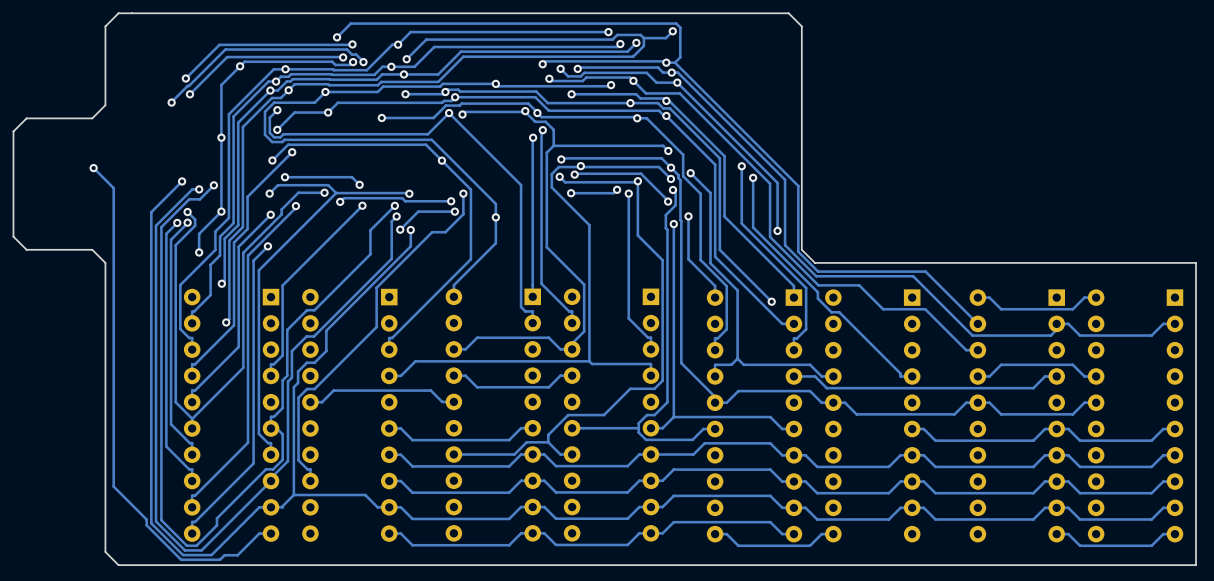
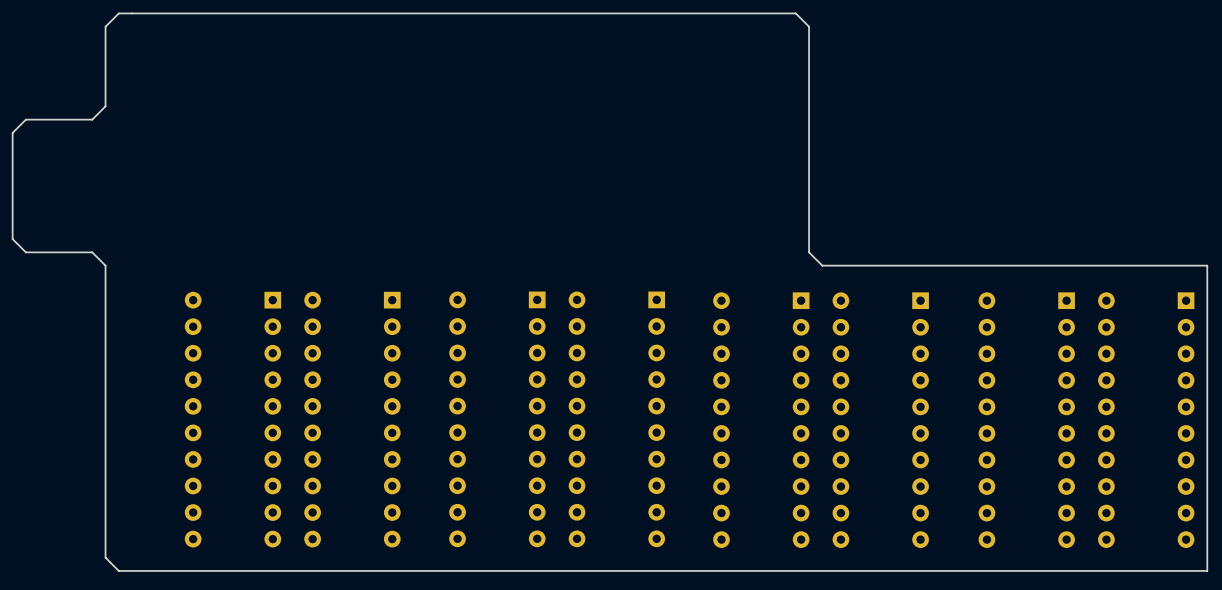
track: (672, 31) (665, 38) (643, 38) -> none
via: (672, 31) -> none
track: (608, 32) (410, 32) (398, 44) (392, 44) (366, 70) (273, 69) (228, 114) (228, 218) (215, 231) (215, 249) (180, 285) (180, 329) (189, 338) (192, 338) (192, 349) -> none
via: (608, 32) -> none
track: (337, 37) (350, 23) (676, 23) (680, 27) (680, 57) (675, 62) -> none
via: (337, 37) -> none
track: (643, 38) (640, 34) (617, 34) (612, 39) (426, 39) (406, 59) -> none
track: (643, 38) (643, 45) (633, 56) (463, 56) (438, 81) (381, 81) (377, 85) (294, 84) (280, 98) (271, 98) (242, 127) (242, 227) (229, 240) (229, 319) (226, 322) -> none
track: (636, 42) (627, 51) (461, 51) (438, 74) (382, 74) (376, 79) (292, 79) (286, 81) (277, 90) (270, 90) (238, 122) (238, 225) (224, 238) (224, 280) (221, 283) -> none
via: (636, 42) -> none
track: (352, 44) (219, 44) (185, 78) -> none
via: (352, 44) -> none
via: (398, 44) -> none
track: (620, 44) (617, 47) (434, 47) (414, 66) (382, 66) (374, 74) (291, 74) (288, 76) (280, 76) (276, 81) (268, 81) (233, 116) (233, 223) (220, 236) (220, 255) (210, 264) (210, 295) (192, 311) (192, 323) -> none
via: (620, 44) -> none
track: (343, 57) (227, 57) (189, 94) -> none
via: (343, 57) -> none
via: (406, 59) -> none
track: (353, 62) (350, 64) (335, 64) (332, 61) (244, 61) (221, 85) (221, 211) (199, 233) (199, 252) -> none
via: (353, 62) -> none
track: (363, 62) (356, 54) (352, 54) (346, 49) (225, 49) (171, 102) -> none
via: (363, 62) -> none
via: (666, 62) -> none
track: (675, 62) (545, 61) (542, 64) -> none
track: (675, 62) (798, 186) (798, 251) (818, 271) (925, 271) (977, 323) -> none
via: (542, 64) -> none
via: (240, 66) -> none
via: (391, 66) -> none
track: (560, 68) (568, 76) (580, 76) (584, 72) (646, 72) (656, 82) (677, 82) (777, 182) (777, 230) -> none
via: (560, 68) -> none
track: (577, 68) (658, 67) (663, 72) (677, 72) (785, 179) (785, 245) (816, 276) (913, 276) (972, 335) (1050, 335) (1062, 323) -> none
via: (577, 68) -> none
via: (285, 69) -> none
via: (671, 72) -> none
via: (403, 74) -> none
via: (185, 78) -> none
track: (549, 78) (551, 81) (582, 81) (586, 77) (630, 77) (646, 93) (679, 93) (770, 183) (770, 236) (818, 285) (859, 285) (883, 309) (925, 309) (966, 350) (977, 350) -> none
via: (549, 78) -> none
via: (633, 80) -> none
via: (276, 81) -> none
via: (677, 82) -> none
via: (495, 83) -> none
track: (611, 85) (498, 86) (495, 83) (442, 83) (440, 86) (383, 86) (377, 91) (325, 91) (314, 102) (274, 102) (265, 111) (265, 134) (272, 142) (282, 142) (284, 139) (431, 139) (495, 203) (495, 243) (453, 285) (453, 296) -> none
via: (611, 85) -> none
via: (270, 90) -> none
via: (288, 90) -> none
via: (325, 91) -> none
via: (445, 92) -> none
via: (189, 94) -> none
track: (405, 94) (443, 94) (447, 89) (458, 89) (460, 91) (536, 91) (547, 103) (657, 103) (663, 108) (669, 108) (719, 158) (719, 249) (771, 301) -> none
via: (405, 94) -> none
track: (571, 94) (636, 94) (640, 98) (663, 98) (669, 100) (724, 156) (724, 216) (793, 285) (793, 297) -> none
via: (571, 94) -> none
via: (455, 97) -> none
via: (666, 100) -> none
via: (171, 102) -> none
via: (630, 103) -> none
track: (277, 110) (269, 117) (269, 132) (274, 137) (280, 137) (283, 134) (427, 134) (449, 113) (521, 185) (521, 307) (525, 311) (532, 311) (532, 323) -> none
via: (277, 110) -> none
track: (525, 111) (535, 121) (545, 121) (553, 129) (553, 145) -> none
track: (525, 111) (465, 111) (462, 114) -> none
via: (525, 111) -> none
via: (328, 112) -> none
via: (449, 113) -> none
via: (537, 113) -> none
via: (462, 114) -> none
via: (666, 115) -> none
track: (381, 118) (433, 118) (446, 105) (459, 105) (461, 103) (528, 103) (541, 117) (646, 118) (683, 154) (683, 176) (700, 193) (700, 260) (726, 286) (726, 329) (717, 338) (715, 338) (715, 350) -> none
via: (381, 118) -> none
via: (637, 118) -> none
track: (277, 129) (294, 112) (328, 112) (337, 102) (442, 102) (451, 100) (455, 97) (535, 97) (548, 110) (659, 110) (715, 164) (715, 256) (782, 323) (793, 323) -> none
via: (277, 129) -> none
track: (542, 130) (541, 283) (569, 311) (572, 311) (572, 323) -> none
via: (542, 130) -> none
via: (221, 137) -> none
track: (533, 137) (532, 296) -> none
via: (533, 137) -> none
track: (553, 145) (663, 145) (668, 150) -> none
track: (553, 145) (546, 152) (546, 247) (584, 284) (584, 331) (566, 349) -> none
via: (668, 150) -> none
track: (292, 152) (247, 196) (247, 229) (234, 242) (234, 325) (195, 364) (192, 364) (192, 375) -> none
via: (292, 152) -> none
track: (561, 159) (661, 158) (678, 175) (680, 180) (681, 220) (681, 363) (720, 402) -> none
via: (561, 159) -> none
track: (272, 160) (288, 144) (426, 144) (470, 189) (470, 259) (392, 338) (389, 338) (389, 349) -> none
via: (272, 160) -> none
via: (441, 160) -> none
via: (580, 166) -> none
track: (741, 166) (741, 223) (806, 287) (806, 329) (796, 338) (793, 338) (793, 350) -> none
via: (741, 166) -> none
via: (671, 167) -> none
track: (93, 168) (113, 188) (113, 486) (146, 519) (146, 525) (181, 559) (220, 559) (224, 555) (237, 555) (259, 533) (270, 533) -> none
via: (93, 168) -> none
track: (690, 173) (710, 193) (710, 263) (737, 290) (737, 358) -> none
via: (690, 173) -> none
track: (574, 174) (641, 173) (668, 201) -> none
via: (574, 174) -> none
track: (559, 176) (565, 182) (637, 182) -> none
via: (559, 176) -> none
track: (284, 177) (352, 177) (359, 184) -> none
via: (284, 177) -> none
track: (753, 177) (753, 227) (817, 292) (817, 298) (831, 312) (839, 312) (900, 373) (900, 376) (912, 376) -> none
via: (753, 177) -> none
track: (670, 178) (659, 167) (558, 167) (551, 174) (551, 187) (589, 225) (589, 361) -> none
via: (670, 178) -> none
track: (182, 181) (151, 212) (151, 523) (183, 555) (211, 555) (259, 507) (282, 507) (293, 495) -> none
via: (182, 181) -> none
track: (637, 181) (637, 235) (662, 260) (662, 380) (654, 388) (630, 388) (603, 415) (568, 415) (548, 434) (548, 442) -> none
via: (637, 181) -> none
via: (359, 184) -> none
track: (213, 185) (199, 199) (189, 199) (161, 227) (161, 520) (186, 545) (196, 545) (216, 525) (216, 518) (265, 469) (273, 469) (282, 459) (282, 434) (270, 422) -> none
via: (213, 185) -> none
track: (199, 189) (192, 189) (156, 225) (156, 521) (184, 550) (201, 550) (270, 481) (270, 475) (273, 475) (287, 461) (287, 381) (291, 377) (291, 351) (306, 336) (313, 336) (391, 258) (391, 221) (396, 216) -> none
via: (199, 189) -> none
track: (617, 189) (613, 193) (571, 193) -> none
via: (617, 189) -> none
track: (672, 190) (675, 192) (675, 205) (665, 215) (667, 229) (667, 402) (654, 415) (646, 415) (638, 423) (638, 432) (646, 439) (692, 439) (703, 429) (715, 429) -> none
via: (672, 190) -> none
track: (324, 192) (298, 192) (281, 209) (281, 214) (243, 252) (243, 367) (192, 418) (175, 402) (175, 245) (195, 225) (195, 219) (187, 212) -> none
via: (324, 192) -> none
via: (269, 193) -> none
track: (336, 193) (328, 185) (278, 185) (269, 193) -> none
track: (336, 193) (258, 270) (258, 433) (268, 443) (270, 443) (270, 454) -> none
track: (336, 193) (409, 193) -> none
via: (409, 193) -> none
track: (463, 193) (463, 214) (445, 232) (432, 232) (376, 287) (376, 327) (314, 389) (307, 389) (298, 397) (298, 460) (307, 469) (310, 469) (310, 481) -> none
via: (463, 193) -> none
via: (571, 193) -> none
track: (628, 193) (628, 318) (648, 337) (650, 337) (650, 349) -> none
via: (628, 193) -> none
via: (340, 201) -> none
track: (451, 201) (405, 201) (402, 198) (343, 198) (340, 201) -> none
via: (451, 201) -> none
via: (668, 201) -> none
track: (362, 205) (282, 285) (282, 355) (273, 364) (270, 364) (270, 375) -> none
via: (362, 205) -> none
track: (394, 205) (370, 230) (370, 254) (314, 310) (307, 310) (287, 329) (287, 375) (282, 380) (282, 408) (273, 416) (270, 416) (270, 428) -> none
via: (394, 205) -> none
track: (295, 206) (248, 255) (248, 442) (195, 495) (192, 495) (192, 507) -> none
via: (295, 206) -> none
via: (221, 211) -> none
track: (454, 211) (418, 211) (400, 229) -> none
via: (454, 211) -> none
via: (187, 212) -> none
track: (270, 214) (238, 246) (238, 346) (195, 390) (192, 390) (192, 402) -> none
via: (270, 214) -> none
via: (396, 216) -> none
track: (688, 216) (688, 259) (715, 285) (715, 297) -> none
via: (688, 216) -> none
via: (495, 217) -> none
track: (177, 222) (166, 233) (166, 446) (189, 469) (192, 469) (192, 481) -> none
via: (177, 222) -> none
track: (187, 222) (171, 239) (171, 424) (189, 443) (192, 443) (192, 454) -> none
via: (187, 222) -> none
track: (673, 224) (673, 417) -> none
via: (673, 224) -> none
via: (400, 229) -> none
track: (410, 230) (410, 246) (326, 330) (326, 351) (314, 362) (306, 362) (298, 371) (298, 382) (293, 387) (293, 495) -> none
via: (410, 230) -> none
via: (777, 230) -> none
track: (267, 246) (253, 260) (253, 463) (195, 521) (192, 521) (192, 533) -> none
via: (267, 246) -> none
via: (199, 252) -> none
via: (221, 283) -> none
track: (1096, 297) (1084, 297) (1072, 309) (1001, 309) (989, 297) (977, 297) -> none
via: (771, 301) -> none
via: (226, 322) -> none
track: (1174, 323) (1163, 323) (1151, 335) (1080, 335) (1068, 323) (1056, 323) -> none
track: (572, 349) (560, 349) (548, 337) (477, 337) (465, 349) (453, 349) -> none
track: (737, 358) (731, 364) (715, 364) (715, 376) -> none
track: (737, 358) (743, 364) (810, 364) (821, 376) (833, 376) -> none
track: (589, 361) (415, 361) (400, 375) (389, 375) -> none
track: (589, 361) (592, 364) (650, 364) (650, 375) -> none
track: (572, 375) (560, 375) (548, 387) (477, 387) (465, 375) (453, 375) -> none
track: (1056, 376) (1045, 376) (1033, 388) (826, 388) (815, 376) (793, 376) -> none
track: (1096, 376) (1084, 376) (1072, 364) (1001, 364) (989, 376) (977, 376) -> none
track: (453, 401) (442, 401) (430, 390) (333, 390) (322, 402) (310, 402) -> none
track: (1096, 402) (1084, 402) (1072, 414) (1001, 414) (989, 402) (966, 402) (954, 414) (856, 414) (844, 402) (821, 402) (810, 391) (738, 391) (726, 402) (715, 402) -> none
track: (532, 428) (521, 428) (509, 440) (412, 440) (400, 428) (389, 428) -> none
track: (638, 428) (572, 428) -> none
track: (650, 428) (662, 428) (673, 417) (770, 417) (782, 429) (793, 429) -> none
track: (1174, 429) (1163, 429) (1151, 440) (1080, 440) (1068, 429) (1045, 429) (1033, 440) (935, 440) (923, 429) (912, 429) -> none
track: (548, 442) (526, 442) (514, 454) (453, 454) -> none
track: (548, 442) (560, 454) (572, 454) -> none
track: (389, 454) (400, 454) (412, 466) (509, 466) (521, 454) (544, 454) (556, 466) (627, 466) (639, 454) (693, 454) (704, 443) (770, 443) (782, 455) (805, 455) (817, 466) (888, 466) (900, 455) (923, 455) (935, 466) (1033, 466) (1045, 455) (1068, 455) (1080, 466) (1151, 466) (1163, 455) (1174, 455) -> none
track: (389, 481) (400, 481) (412, 492) (509, 492) (521, 480) (544, 480) (556, 492) (627, 492) (639, 480) (662, 480) (673, 469) (770, 469) (782, 481) (805, 481) (817, 493) (888, 493) (900, 481) (923, 481) (935, 493) (1033, 493) (1045, 481) (1068, 481) (1080, 493) (1151, 493) (1163, 481) (1174, 481) -> none
track: (293, 495) (365, 495) (377, 507) (400, 507) (412, 518) (509, 518) (521, 507) (544, 507) (556, 518) (627, 518) (639, 507) (662, 507) (673, 495) (770, 495) (782, 507) (805, 507) (817, 519) (888, 519) (900, 507) (923, 507) (935, 519) (1033, 519) (1045, 507) (1068, 507) (1080, 519) (1151, 519) (1163, 507) (1174, 507) -> none
track: (389, 533) (400, 533) (412, 545) (509, 545) (521, 533) (544, 533) (556, 544) (627, 544) (639, 533) (662, 533) (673, 522) (770, 522) (782, 534) (793, 534) -> none
track: (833, 534) (821, 534) (810, 545) (738, 545) (726, 534) (715, 534) -> none
track: (1174, 534) (1163, 534) (1151, 545) (1080, 545) (1068, 534) (1056, 534) -> none

